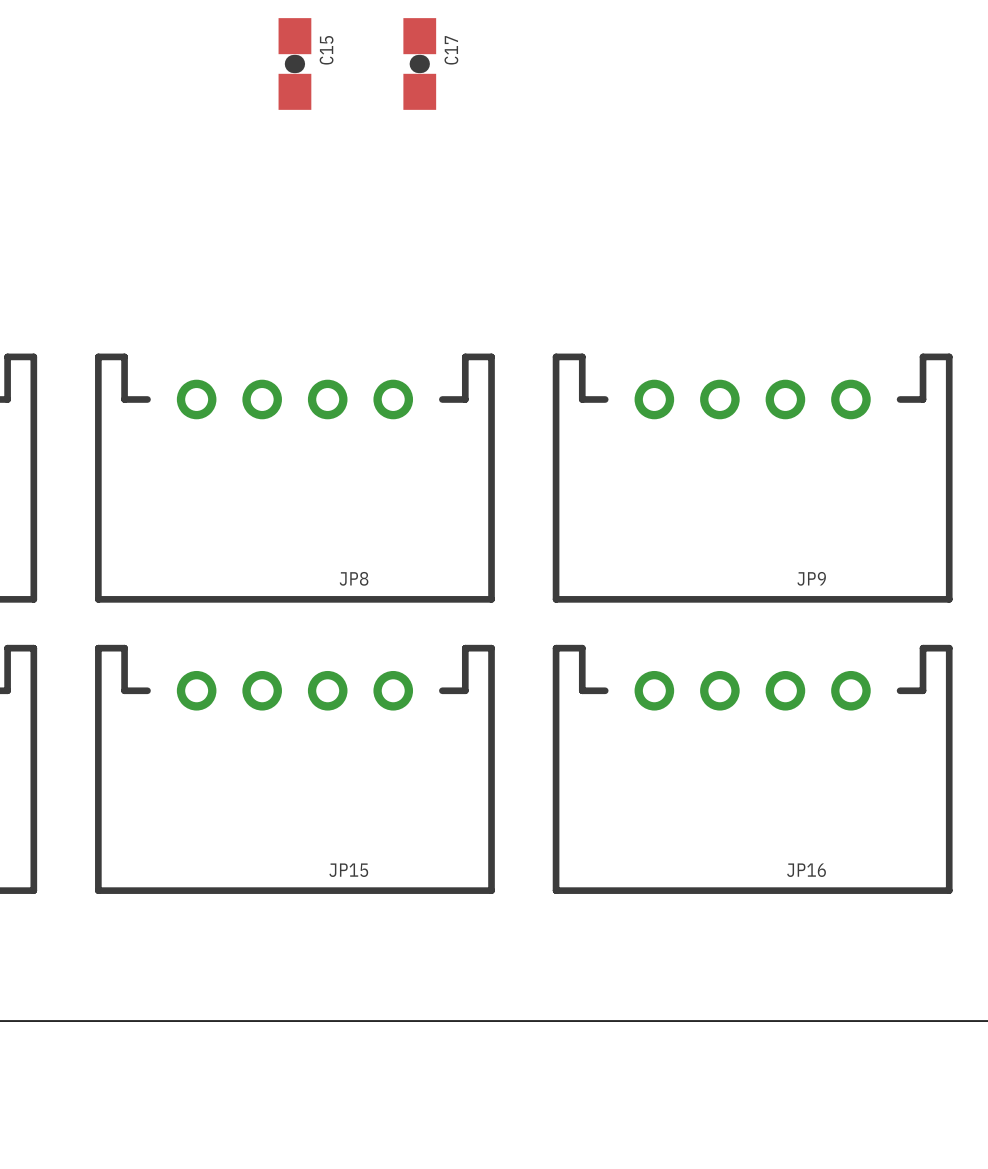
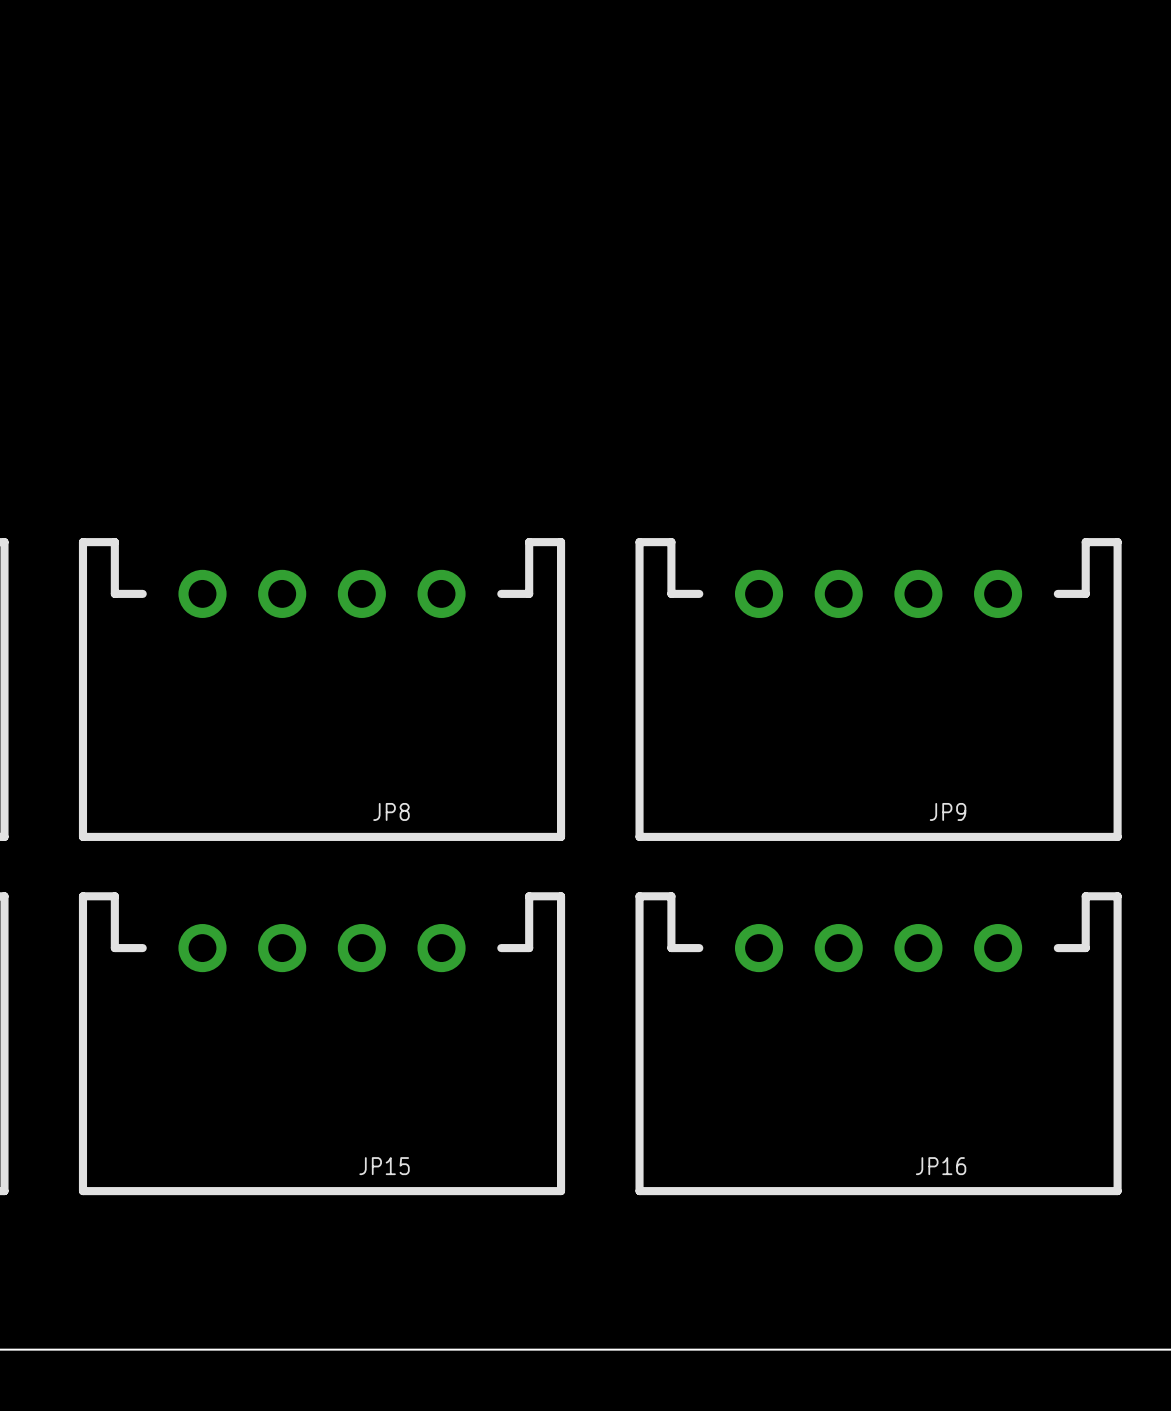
C15: (294, 63) -> none
C17: (419, 63) -> none

